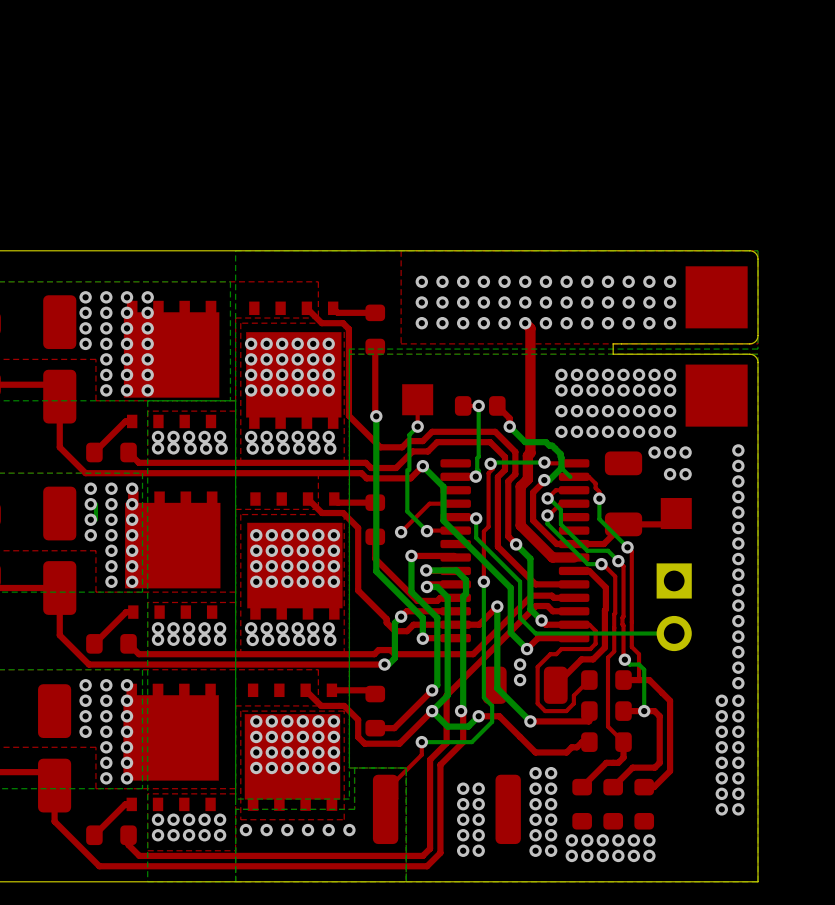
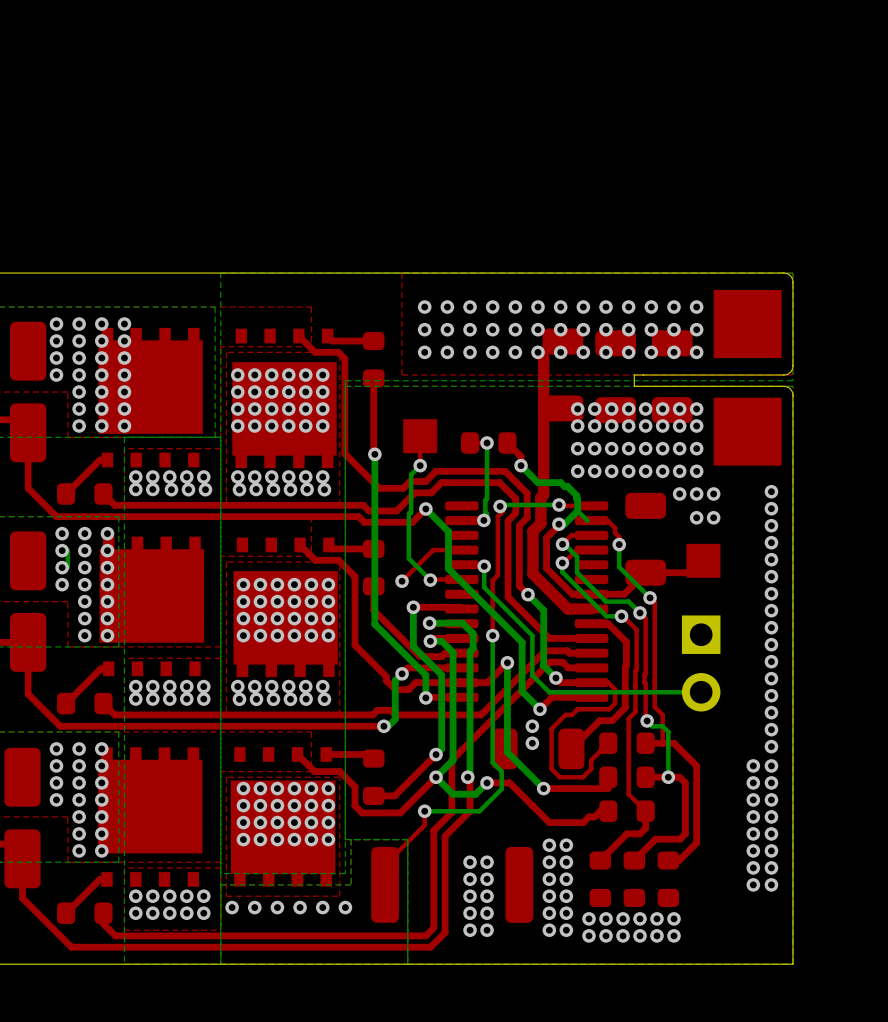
part: none -> (562, 375)
part: none -> (615, 376)
part: none -> (672, 376)

